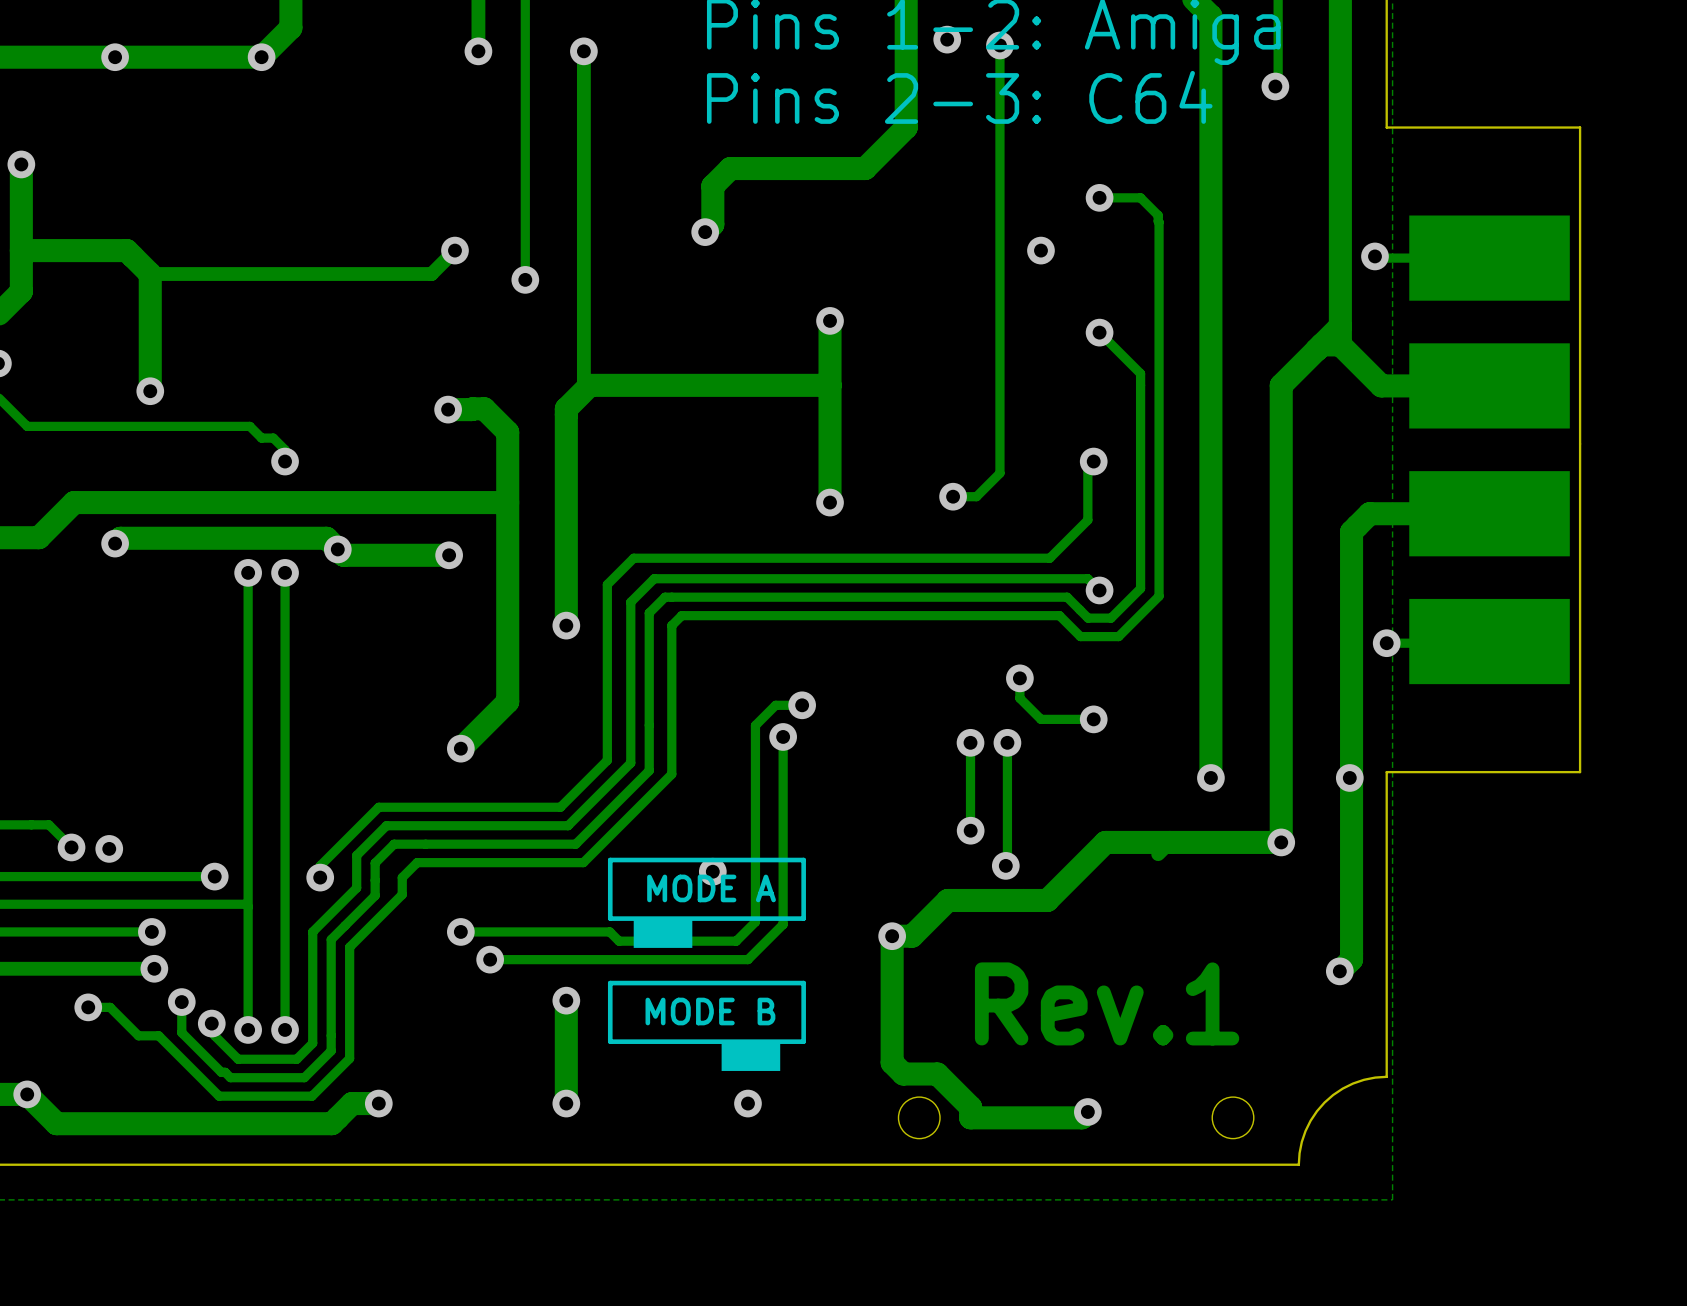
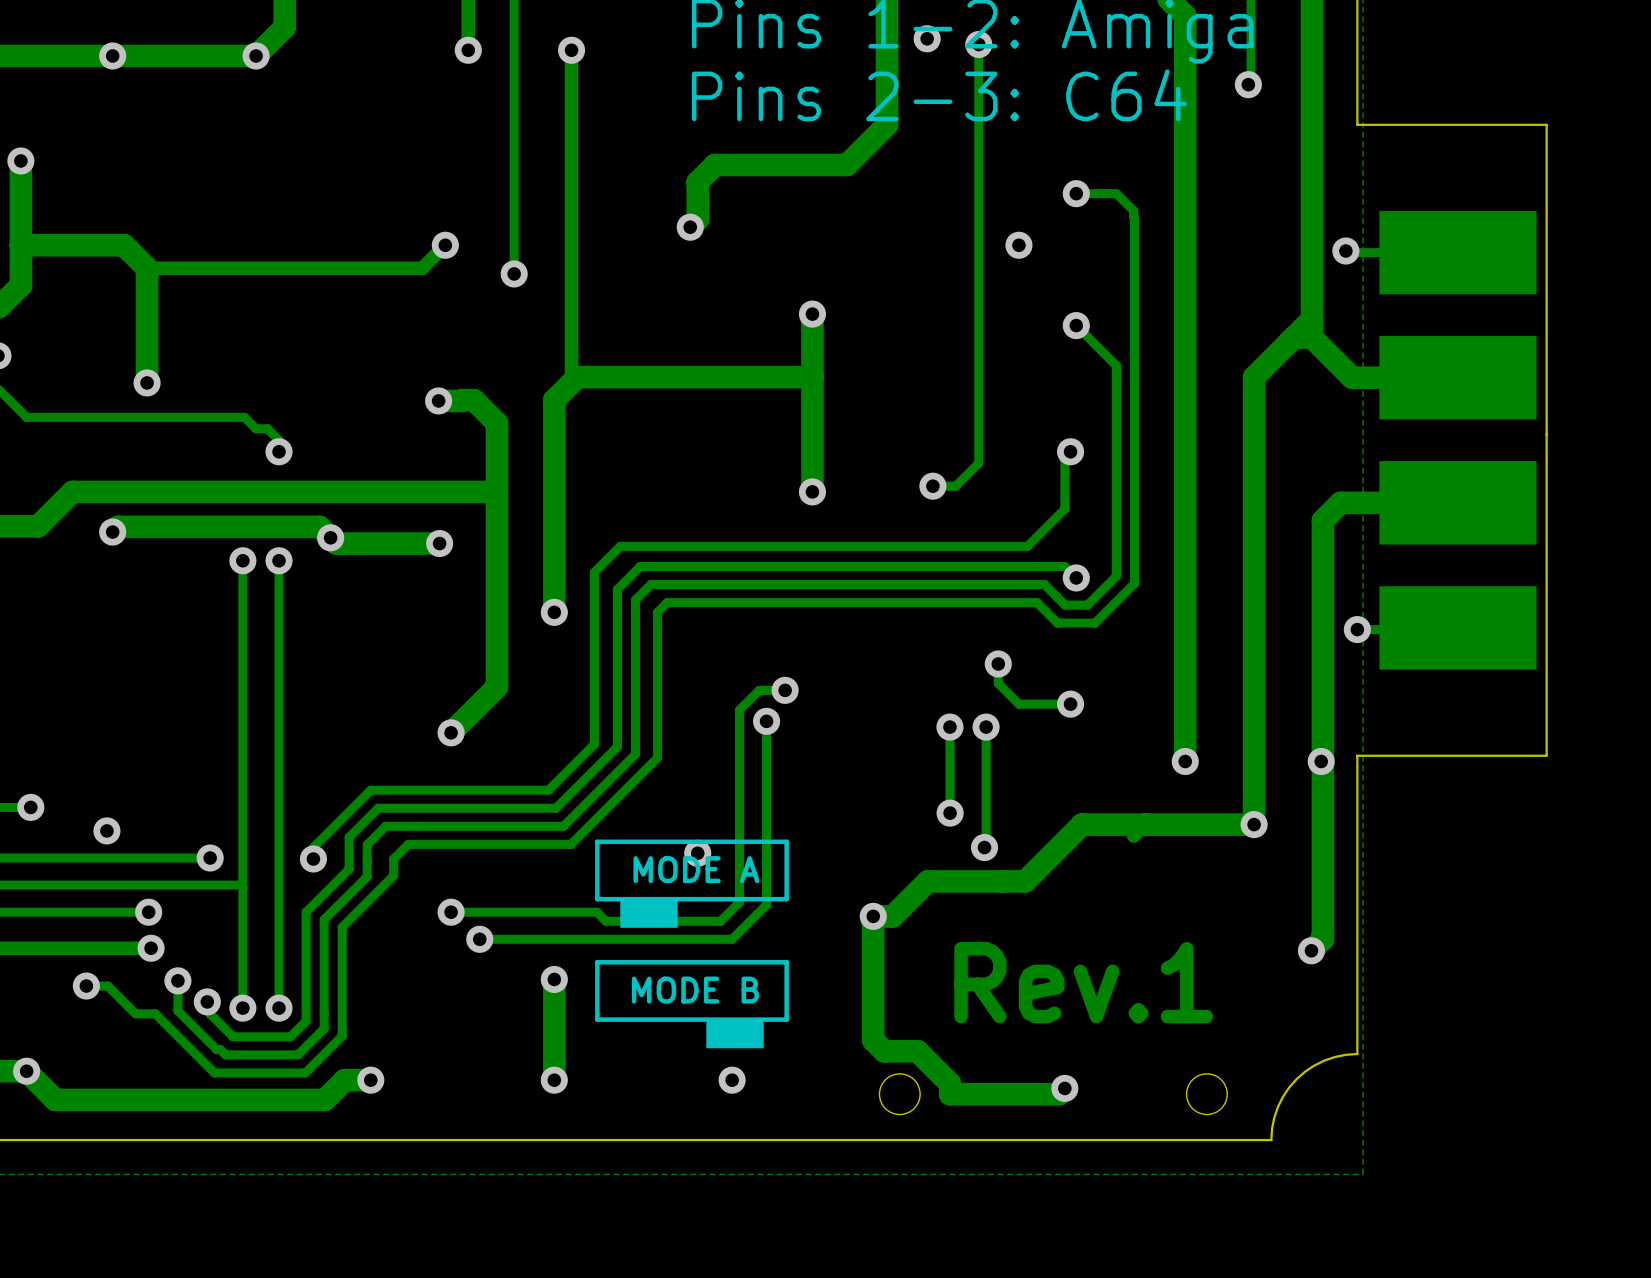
track: (31, 824) (48, 824) (71, 847) -> none
via: none -> (30, 807)
via: (71, 847) -> none

